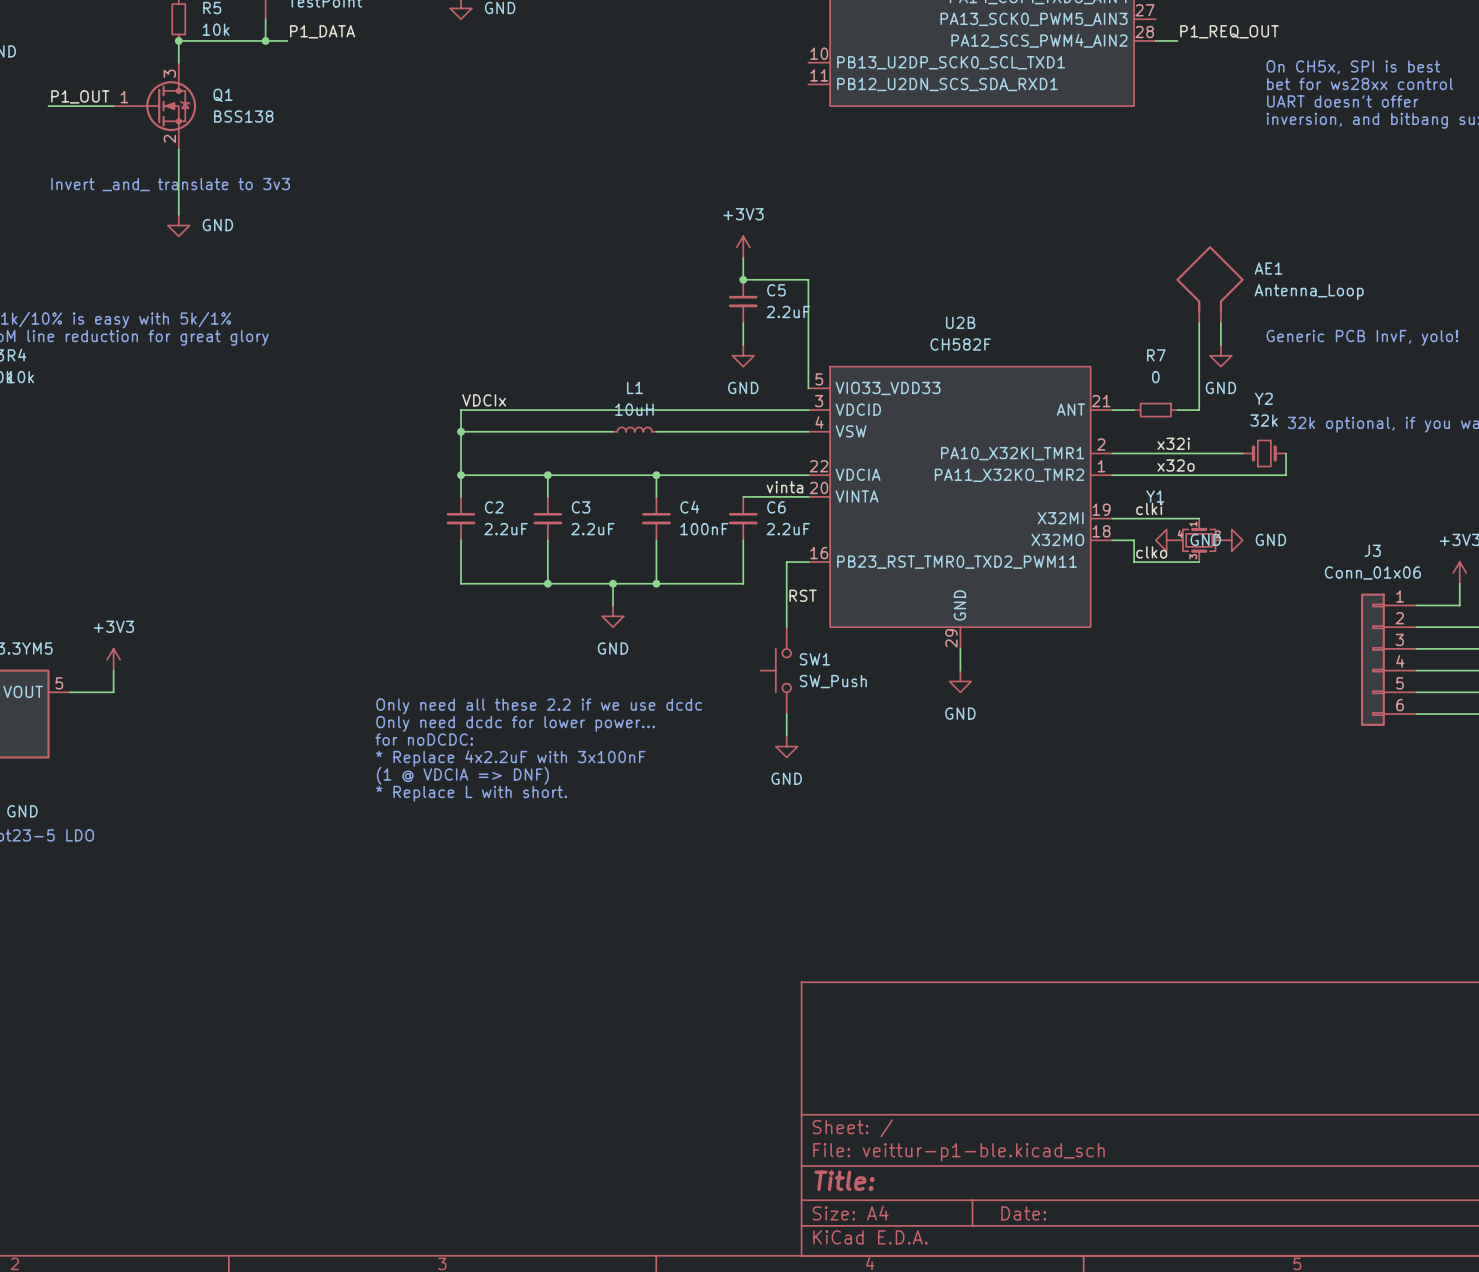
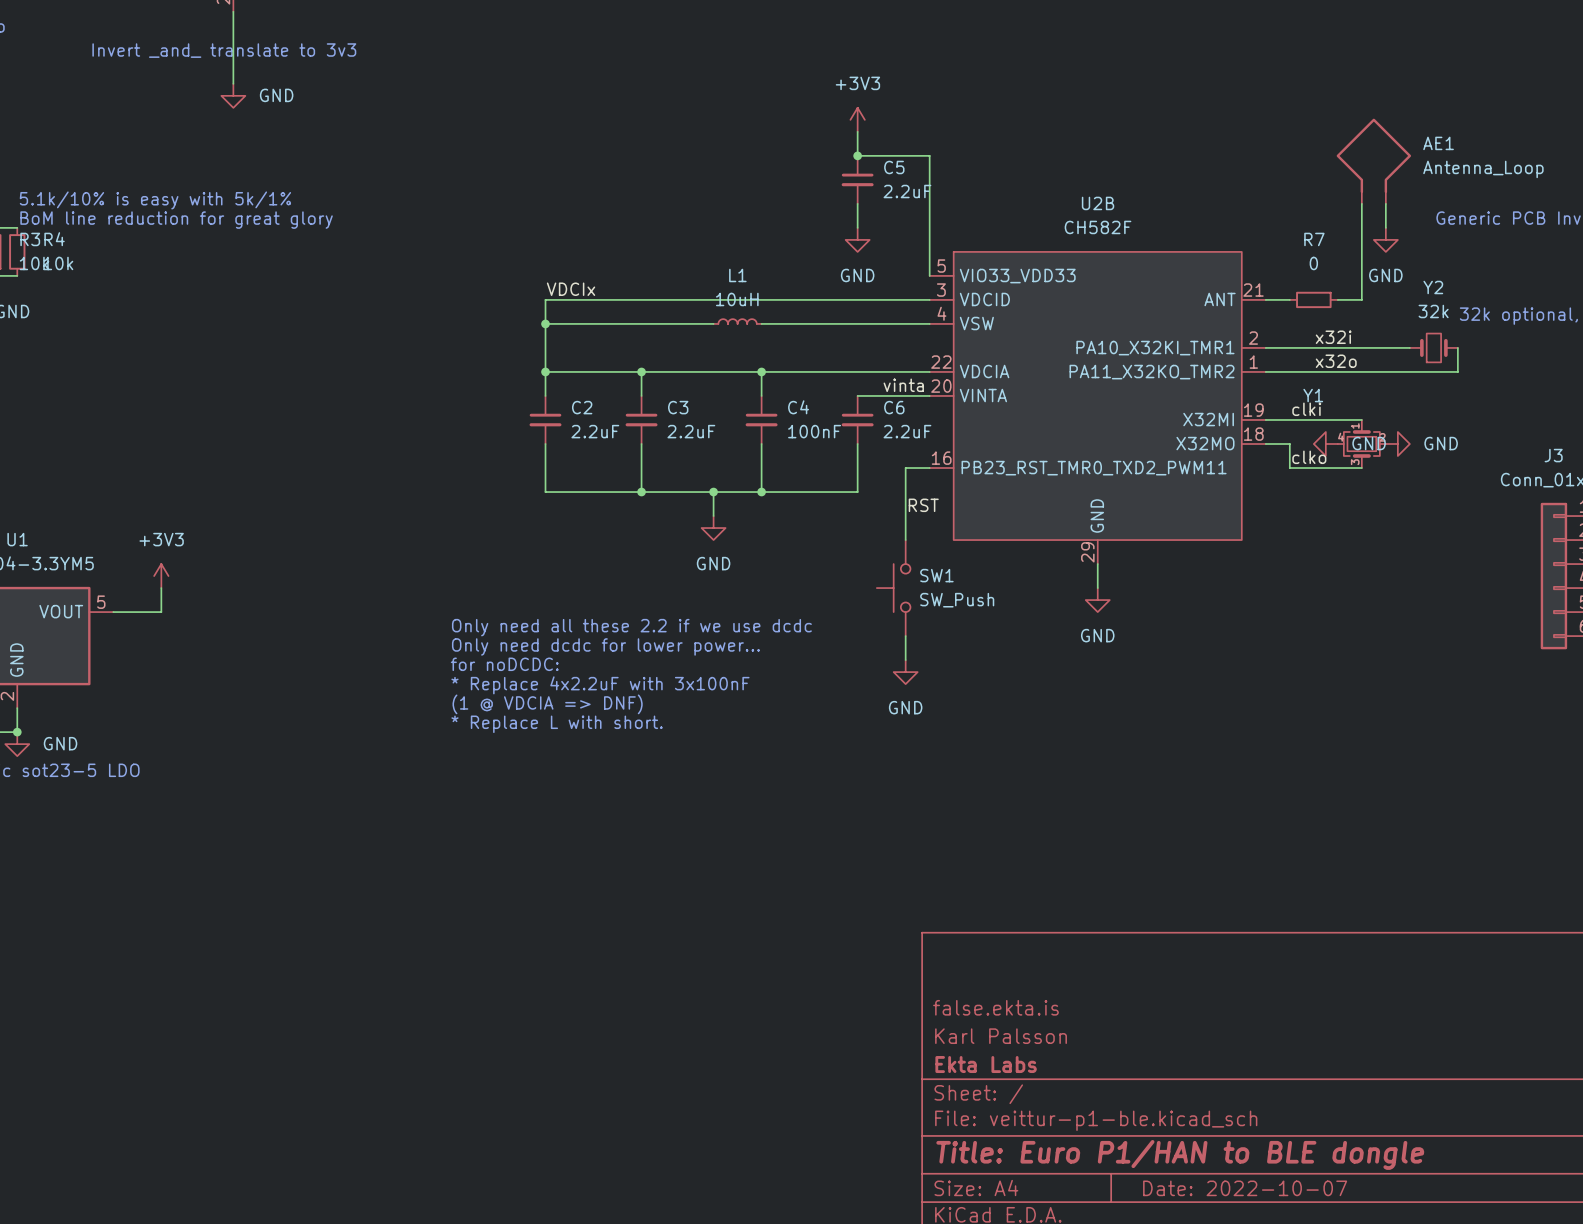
title block: none -> false.ekta.is (995, 1007)
title block: none -> Karl Palsson (1001, 1036)
title block: none -> Ekta Labs (986, 1064)
title block: Title: (844, 1180) -> Title: Euro P1/HAN to BLE dongle (1180, 1154)
title block: Date: (1023, 1213) -> Date: 2022-10-07 (1245, 1188)

